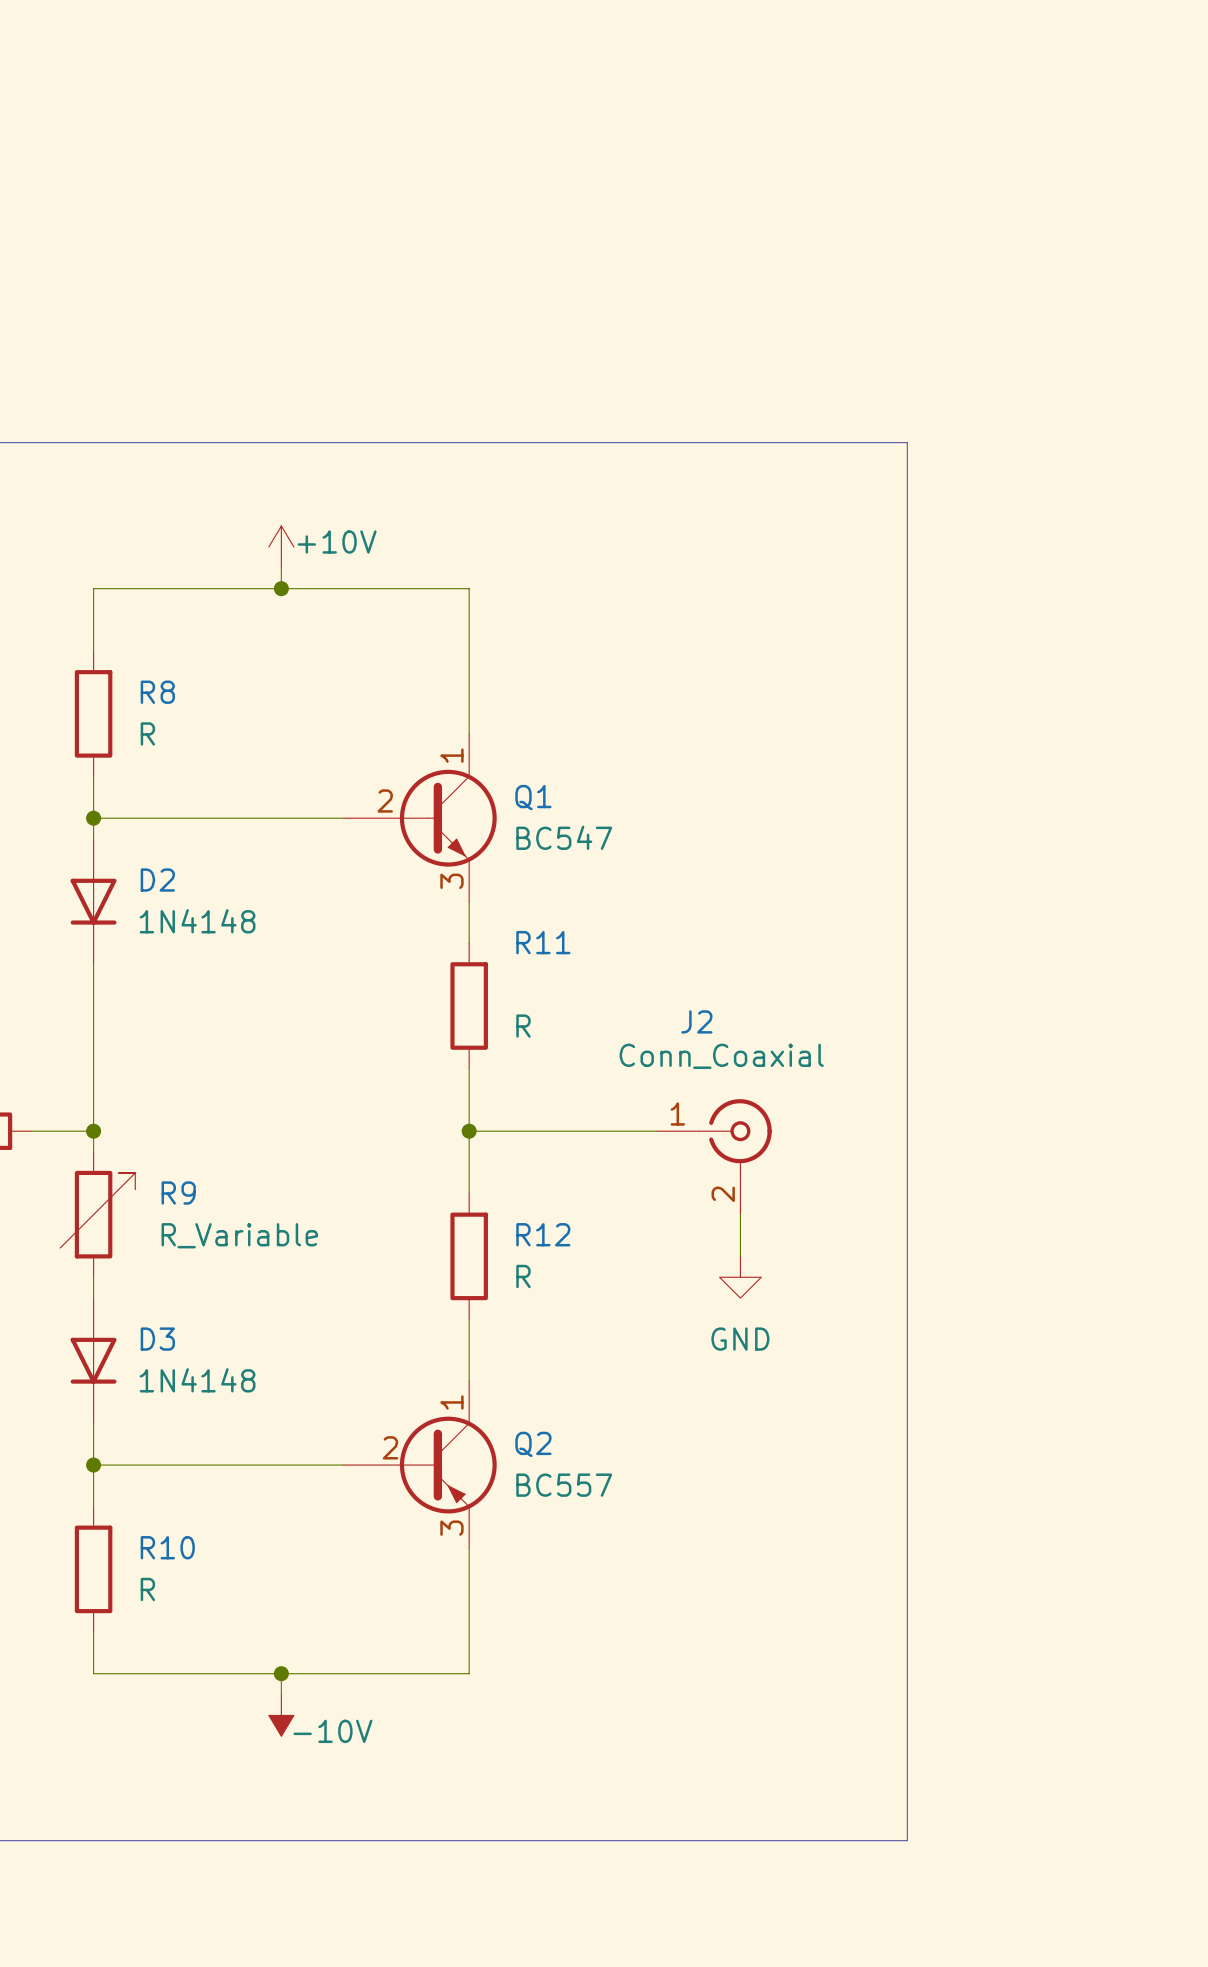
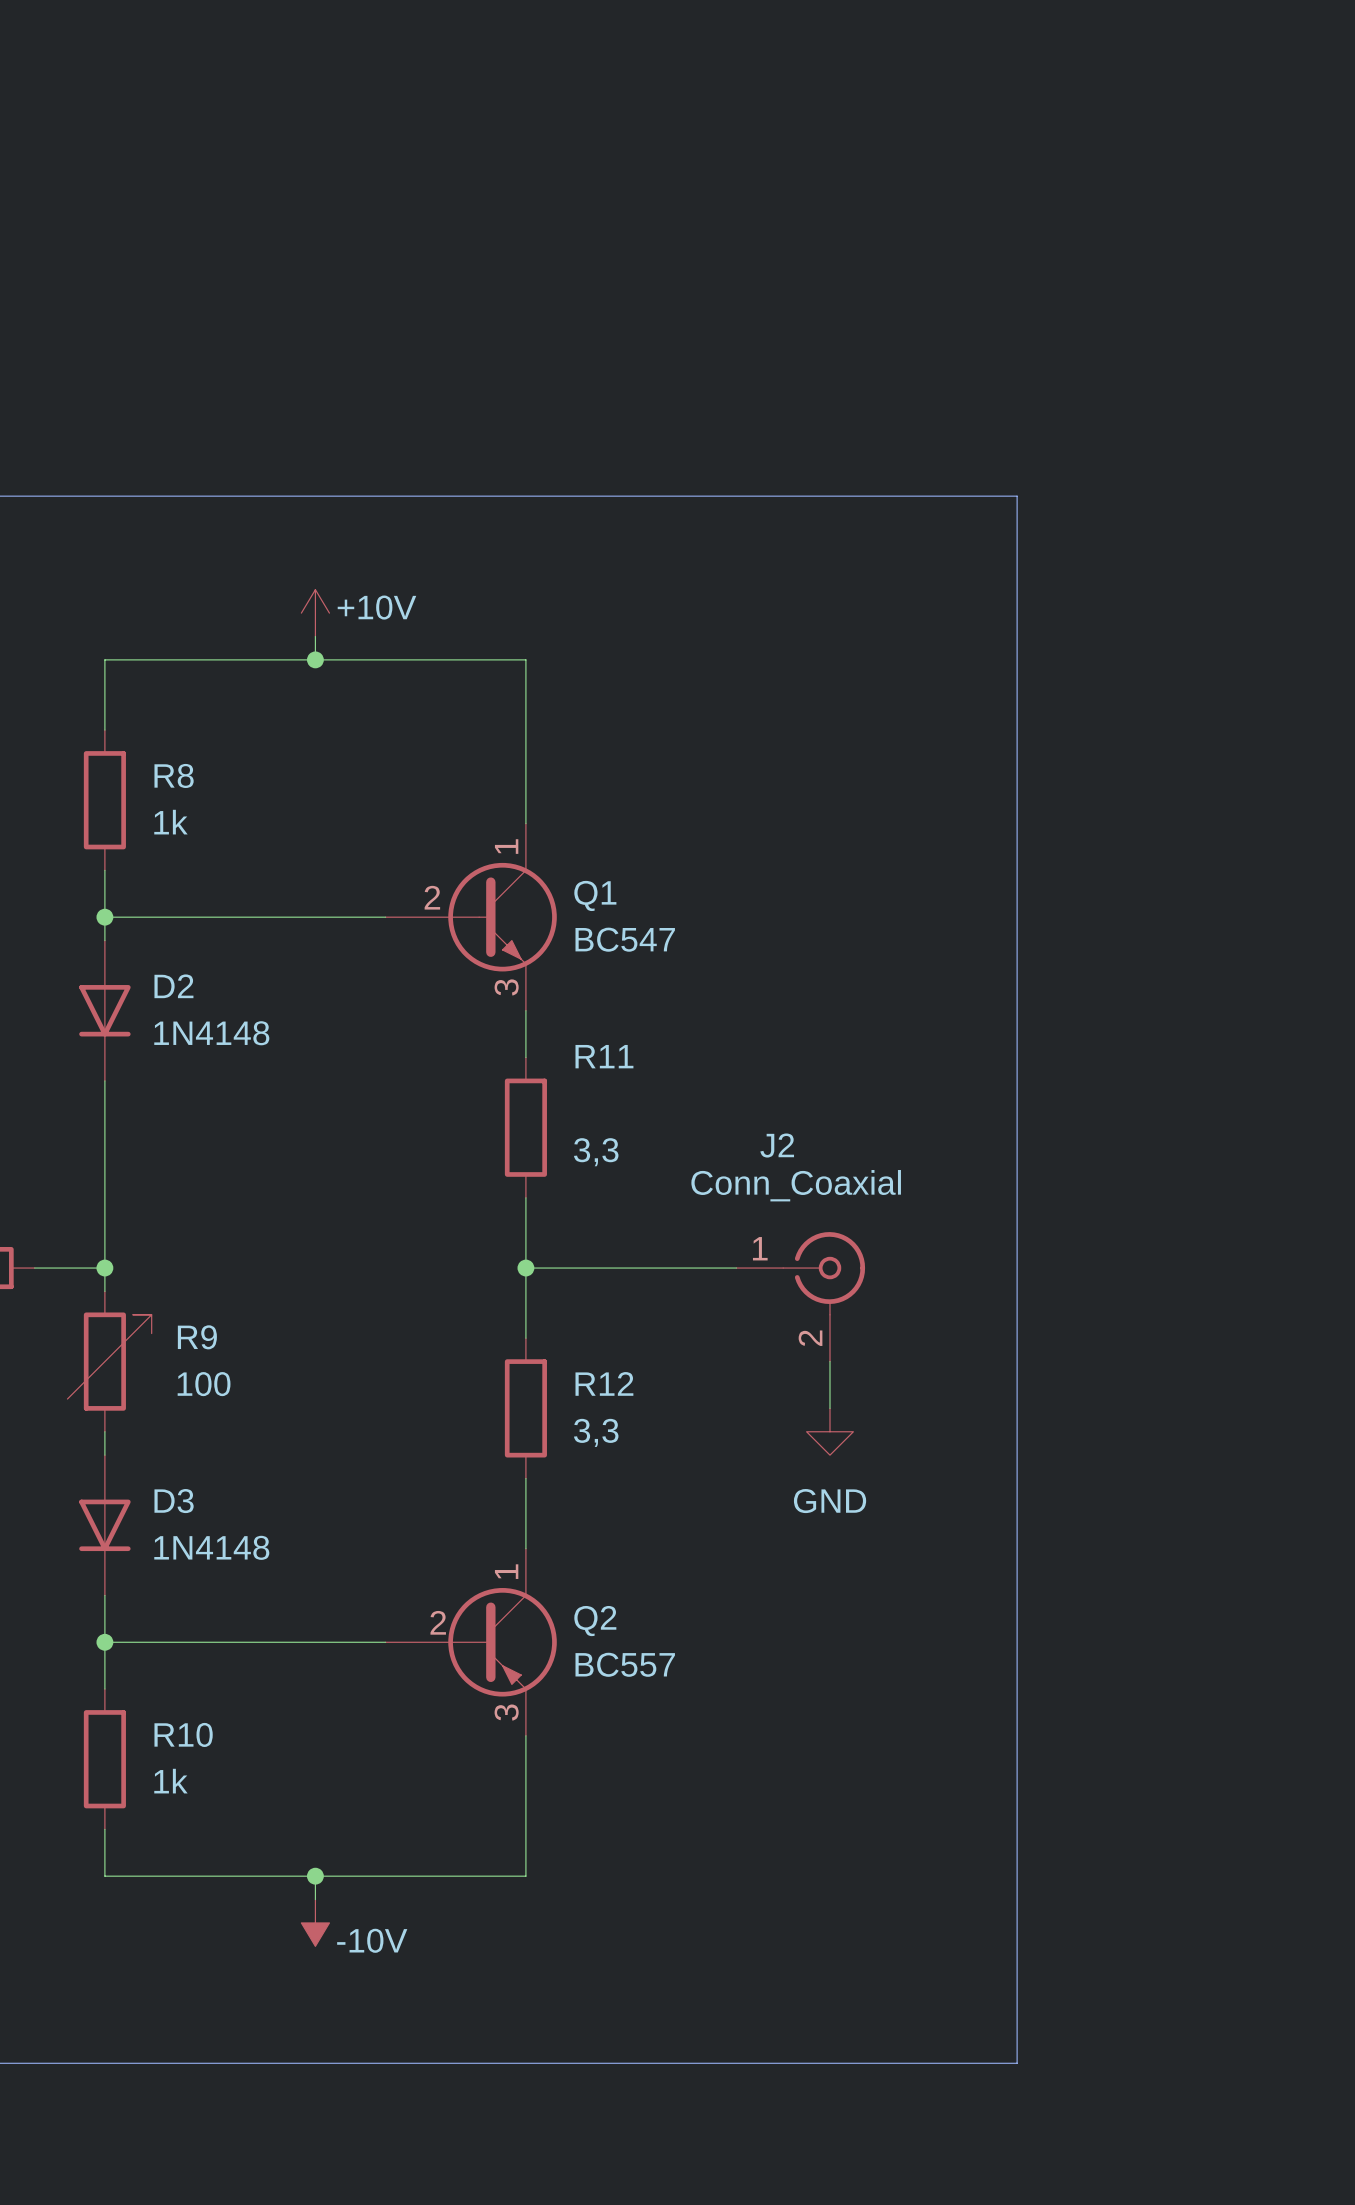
R8 value: R (147, 733) -> 1k (170, 822)
R11 value: R (523, 1026) -> 3,3 (596, 1152)
R9 value: R_Variable (239, 1235) -> 100 (204, 1384)
R12 value: R (523, 1276) -> 3,3 (596, 1432)
R10 value: R (147, 1589) -> 1k (170, 1781)

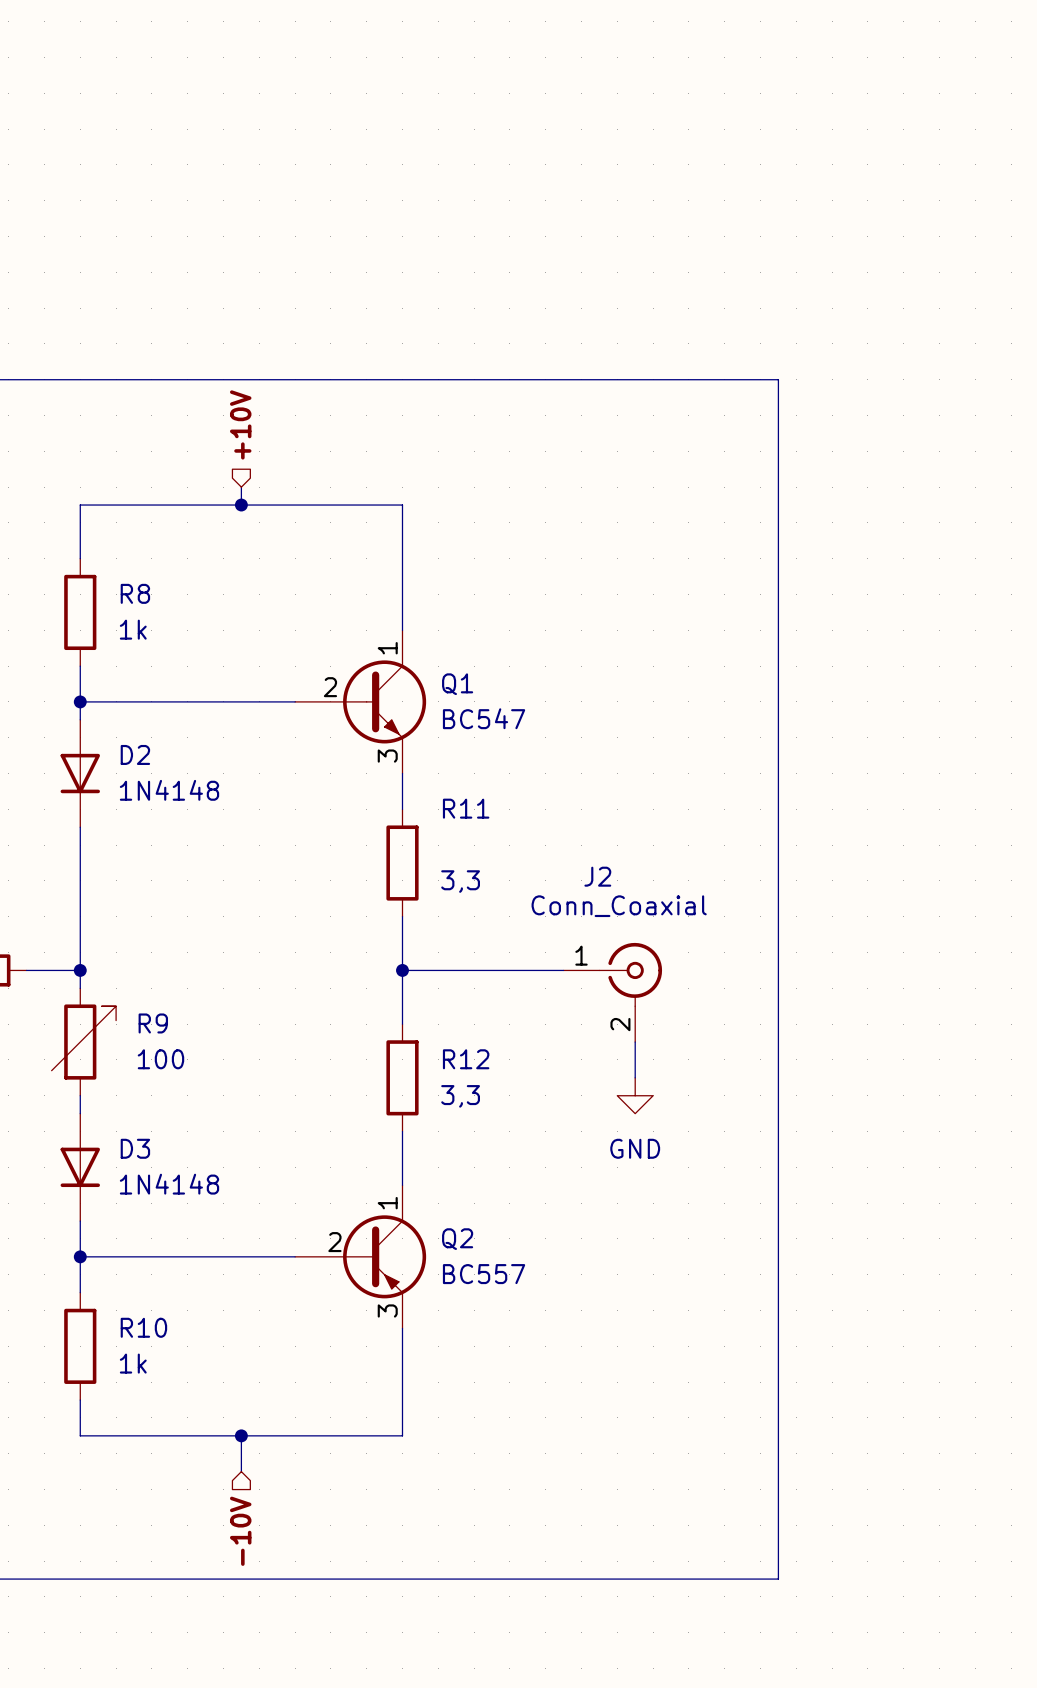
hierarchical label: none -> +10V (240, 424)
power symbol: +10V (315, 613) -> none
power symbol: -10V (315, 1922) -> none
hierarchical label: none -> -10V (240, 1531)

